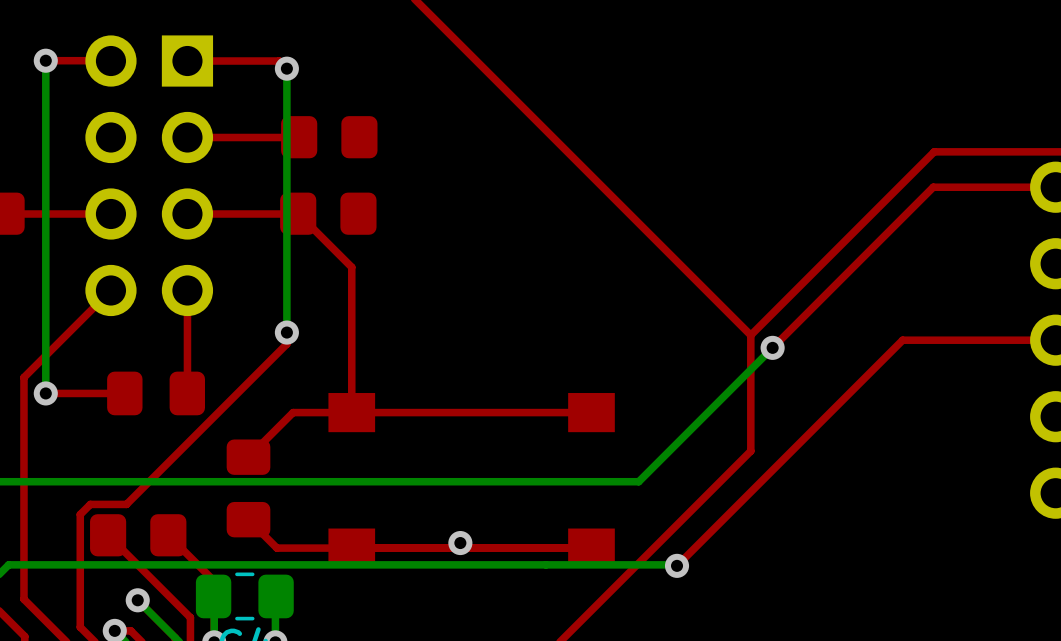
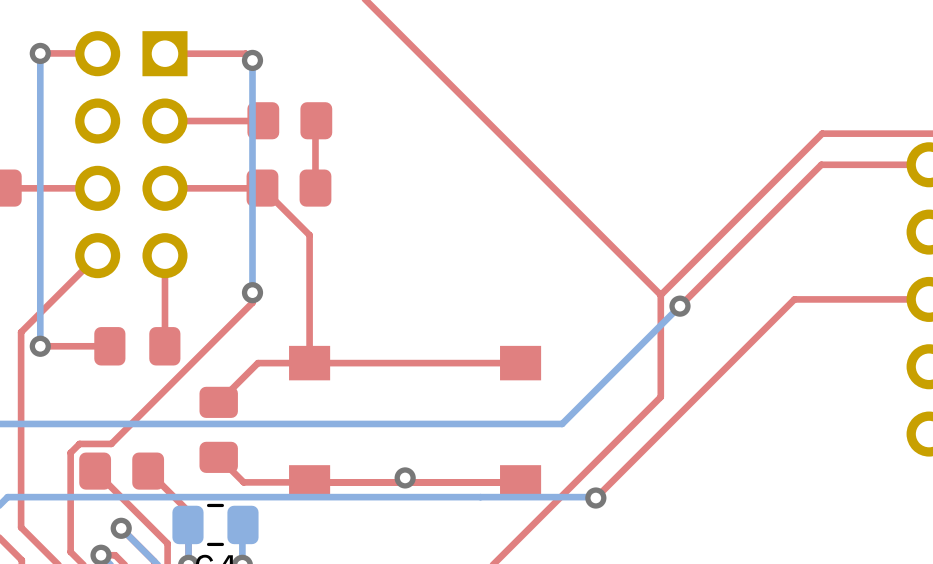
top track: none -> (315, 121) (315, 188)

